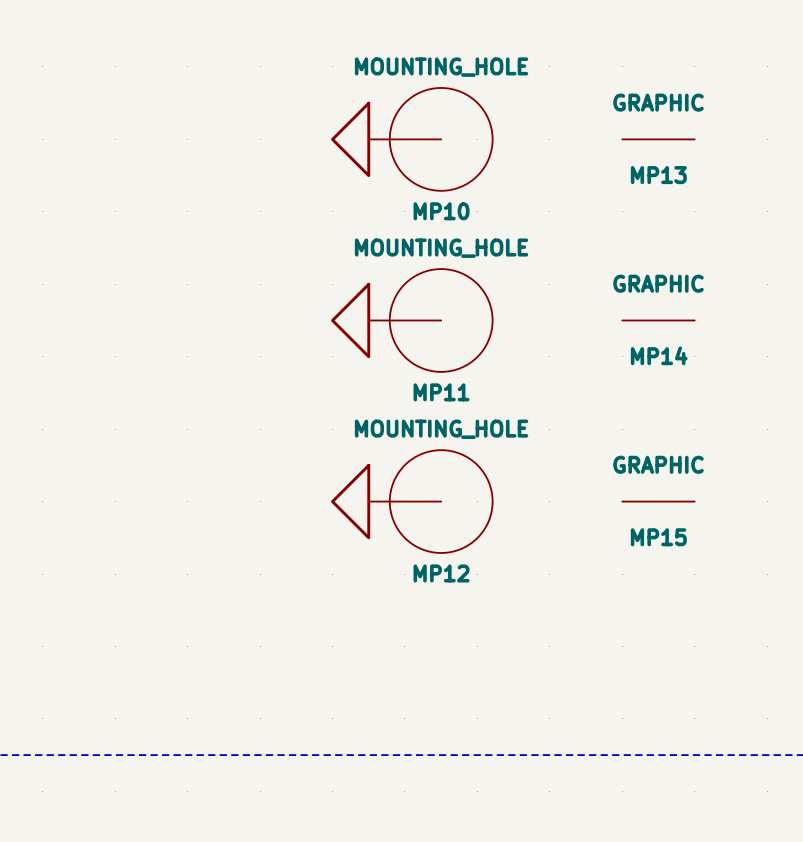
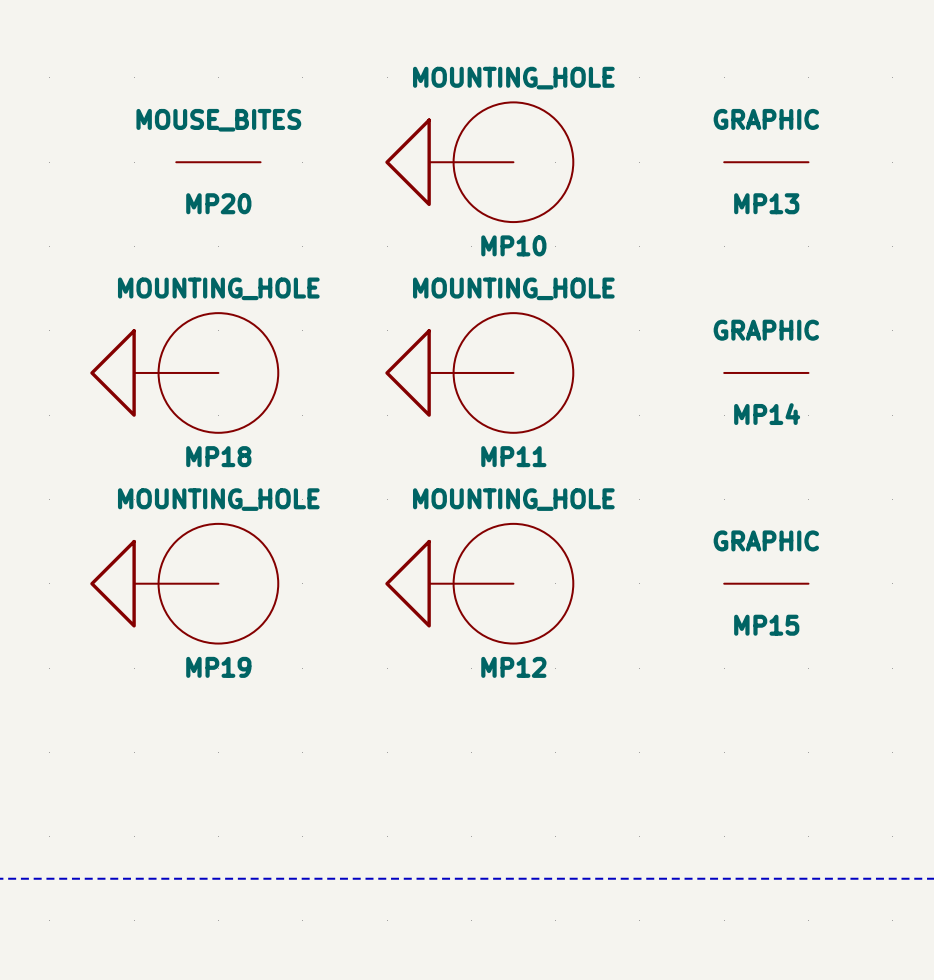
MP20: none -> MOUSE_BITES (218, 162)
power symbol: none -> (113, 372)
MP18: none -> MOUNTING_HOLE (206, 372)
power symbol: none -> (113, 583)
MP19: none -> MOUNTING_HOLE (206, 583)

